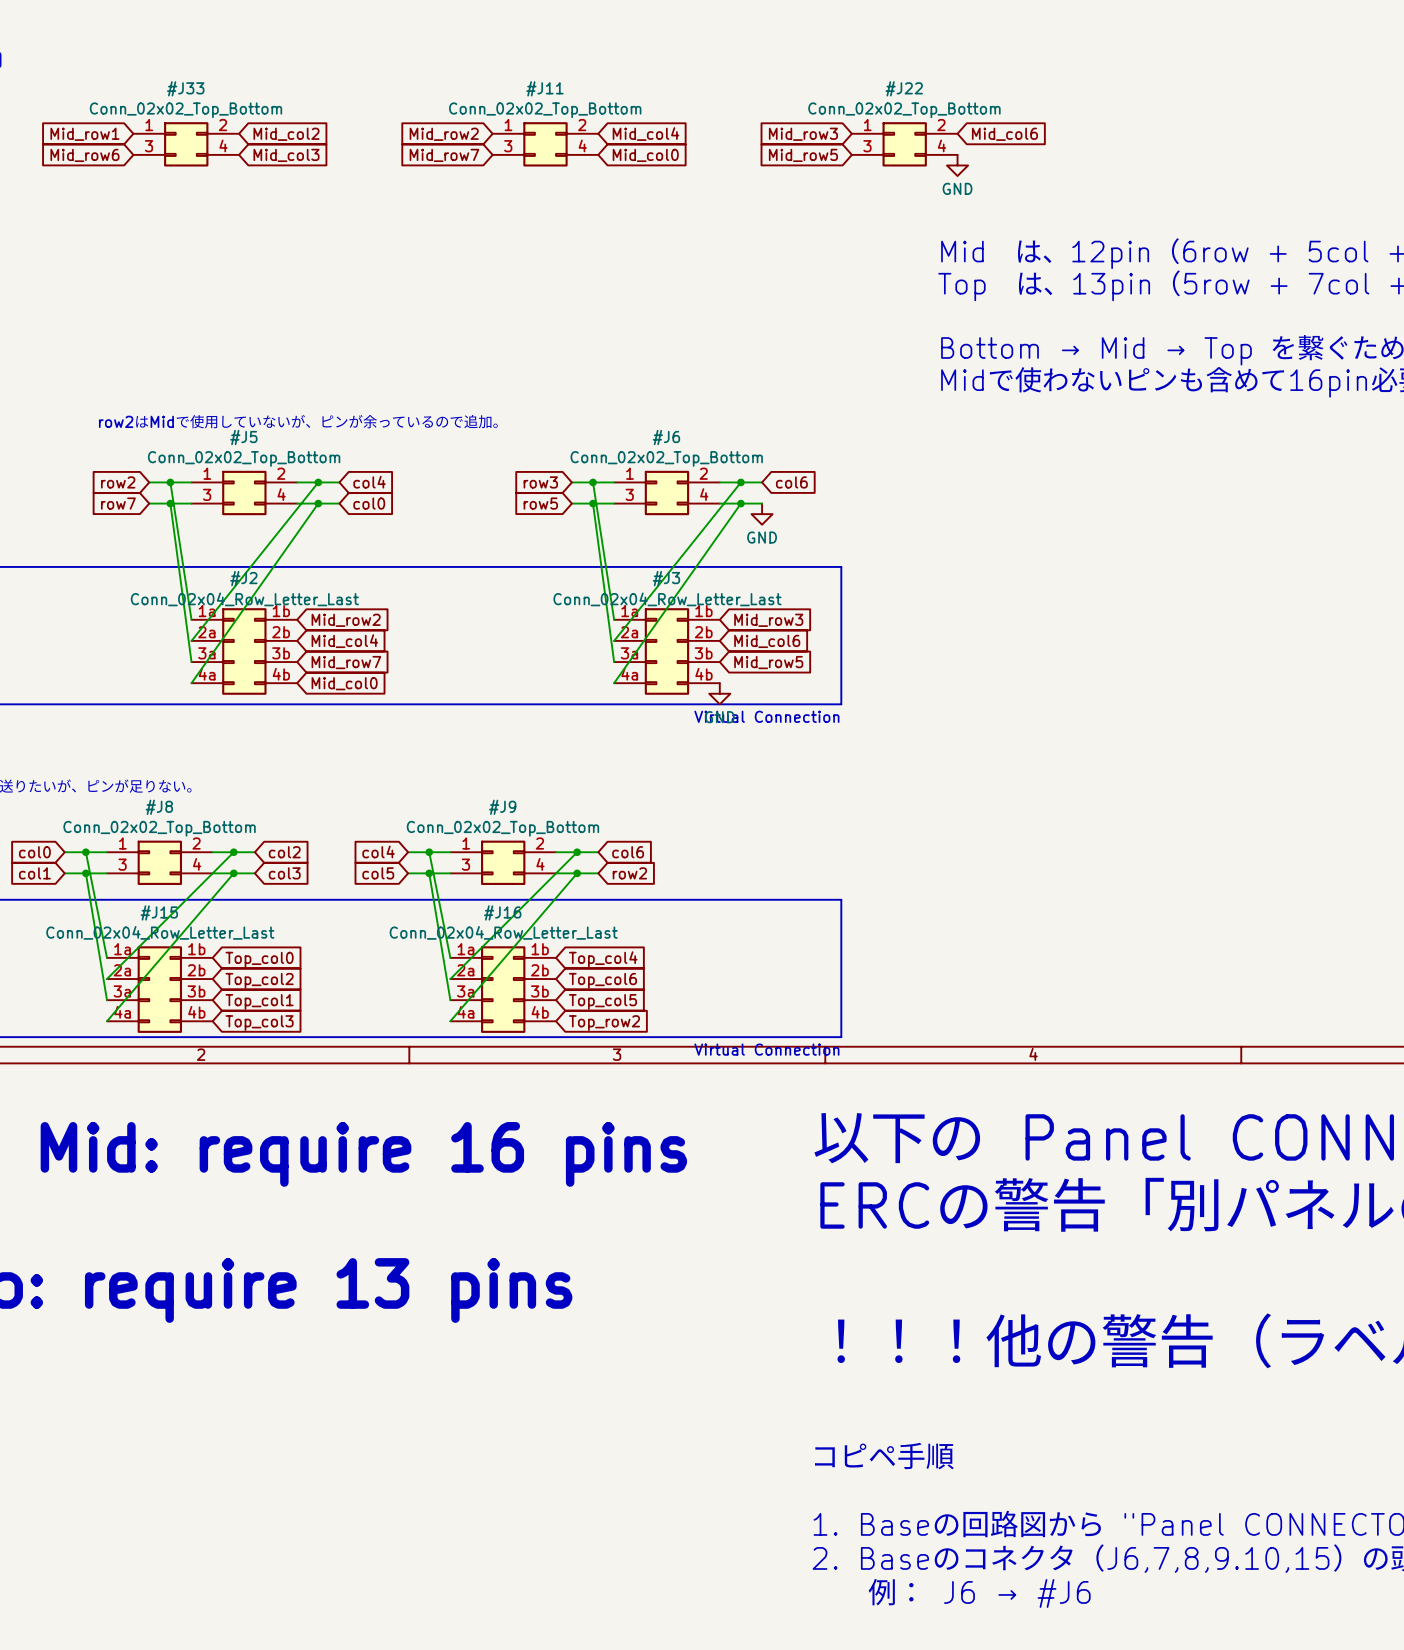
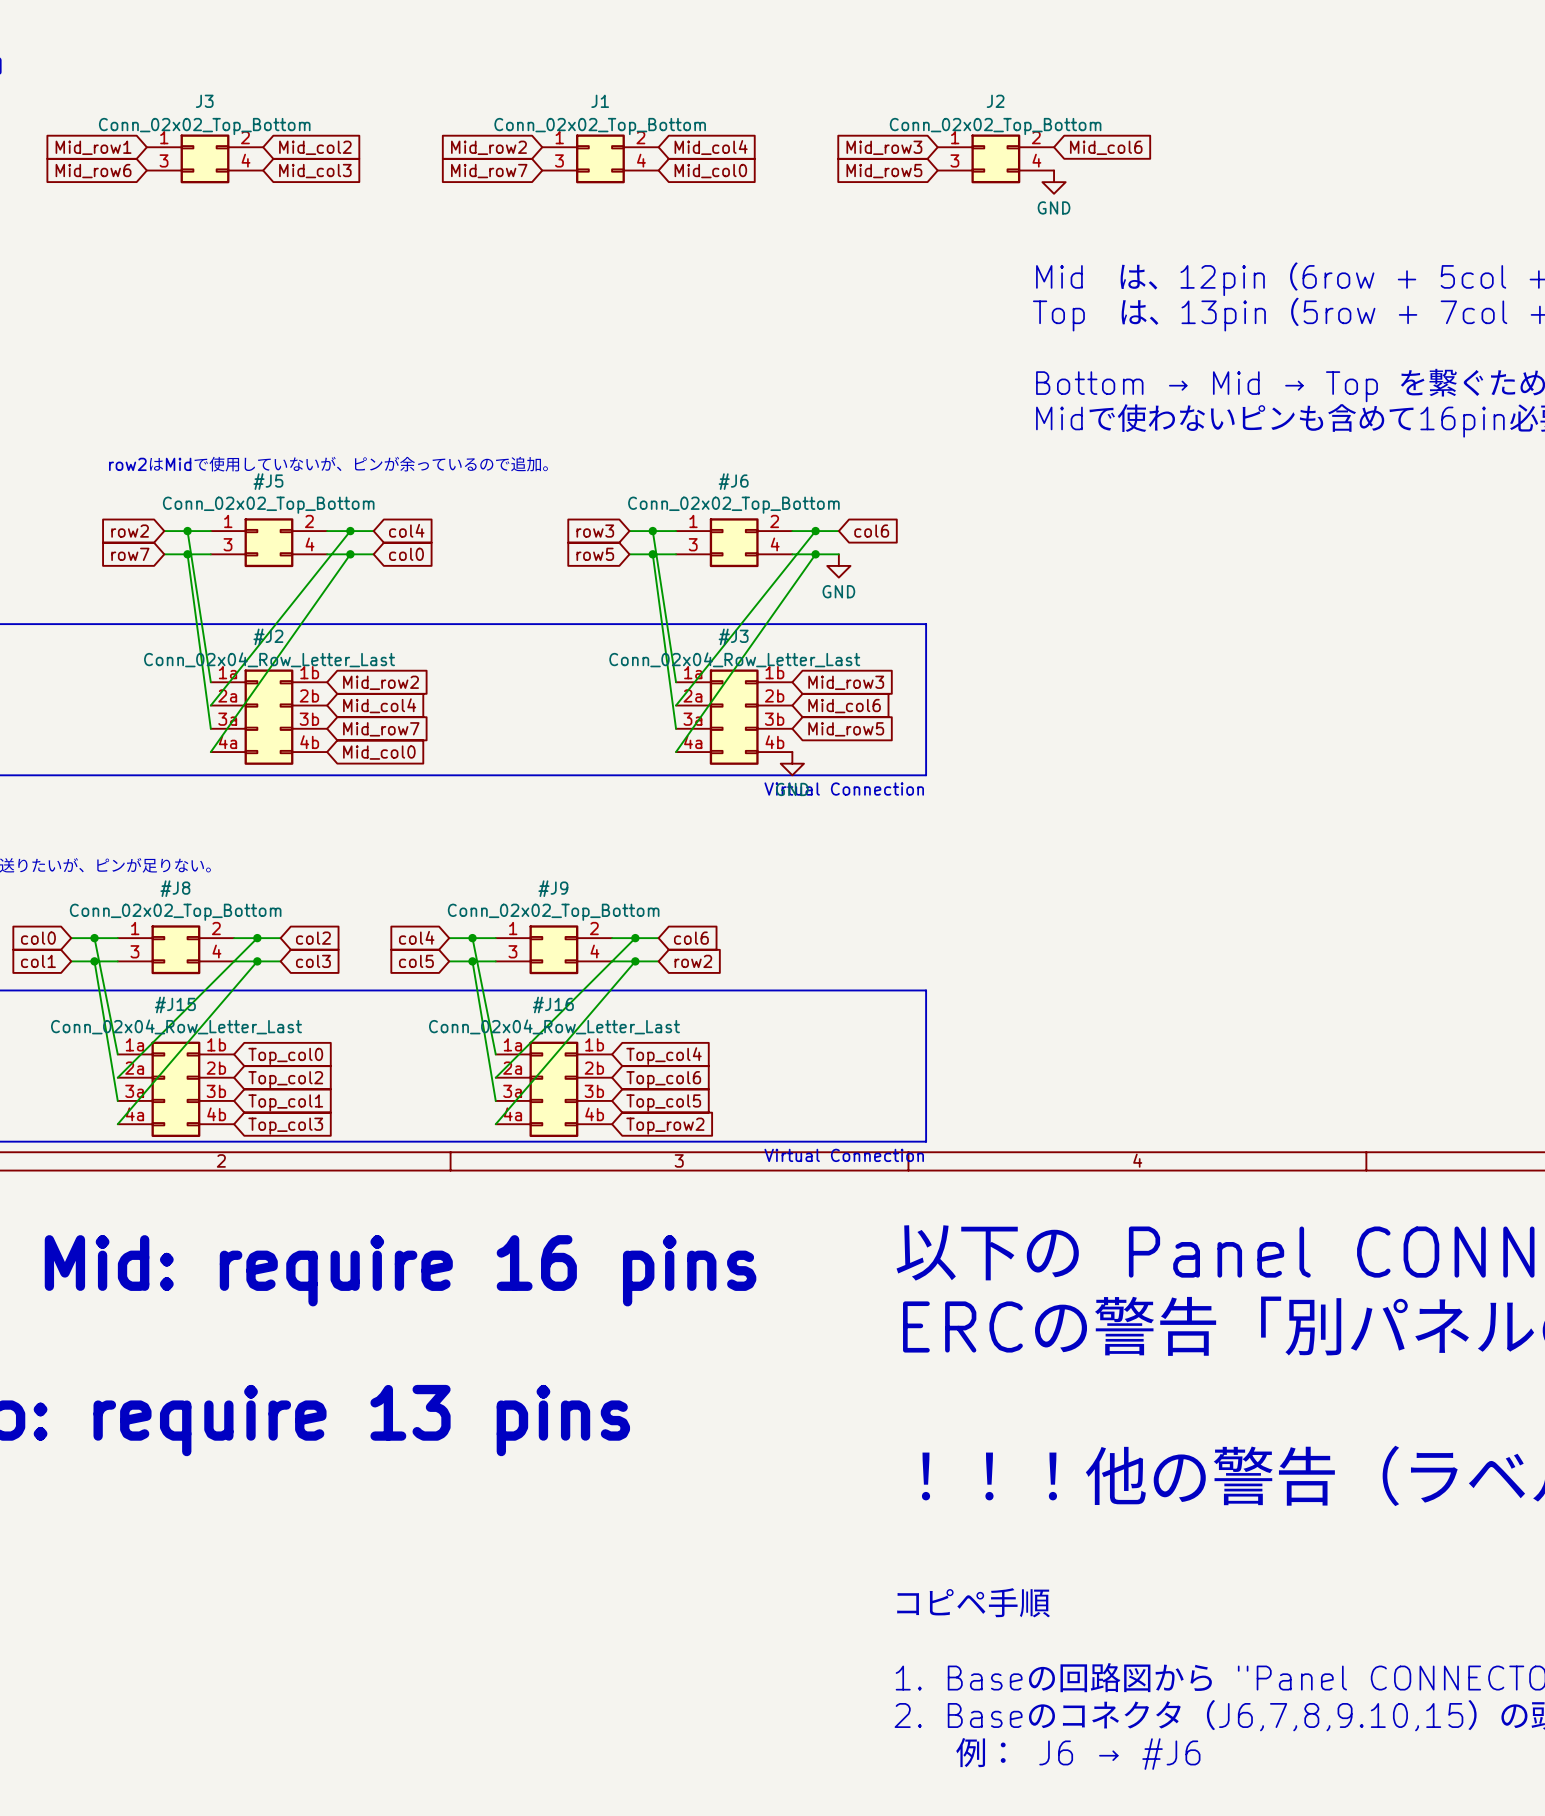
#J33: Conn_02x02_Top_Bottom (186, 144) -> none
J3: none -> Conn_02x02_Top_Bottom (205, 158)
#J11: Conn_02x02_Top_Bottom (545, 144) -> none
J1: none -> Conn_02x02_Top_Bottom (600, 158)
#J22: Conn_02x02_Top_Bottom (904, 144) -> none
J2: none -> Conn_02x02_Top_Bottom (995, 158)

